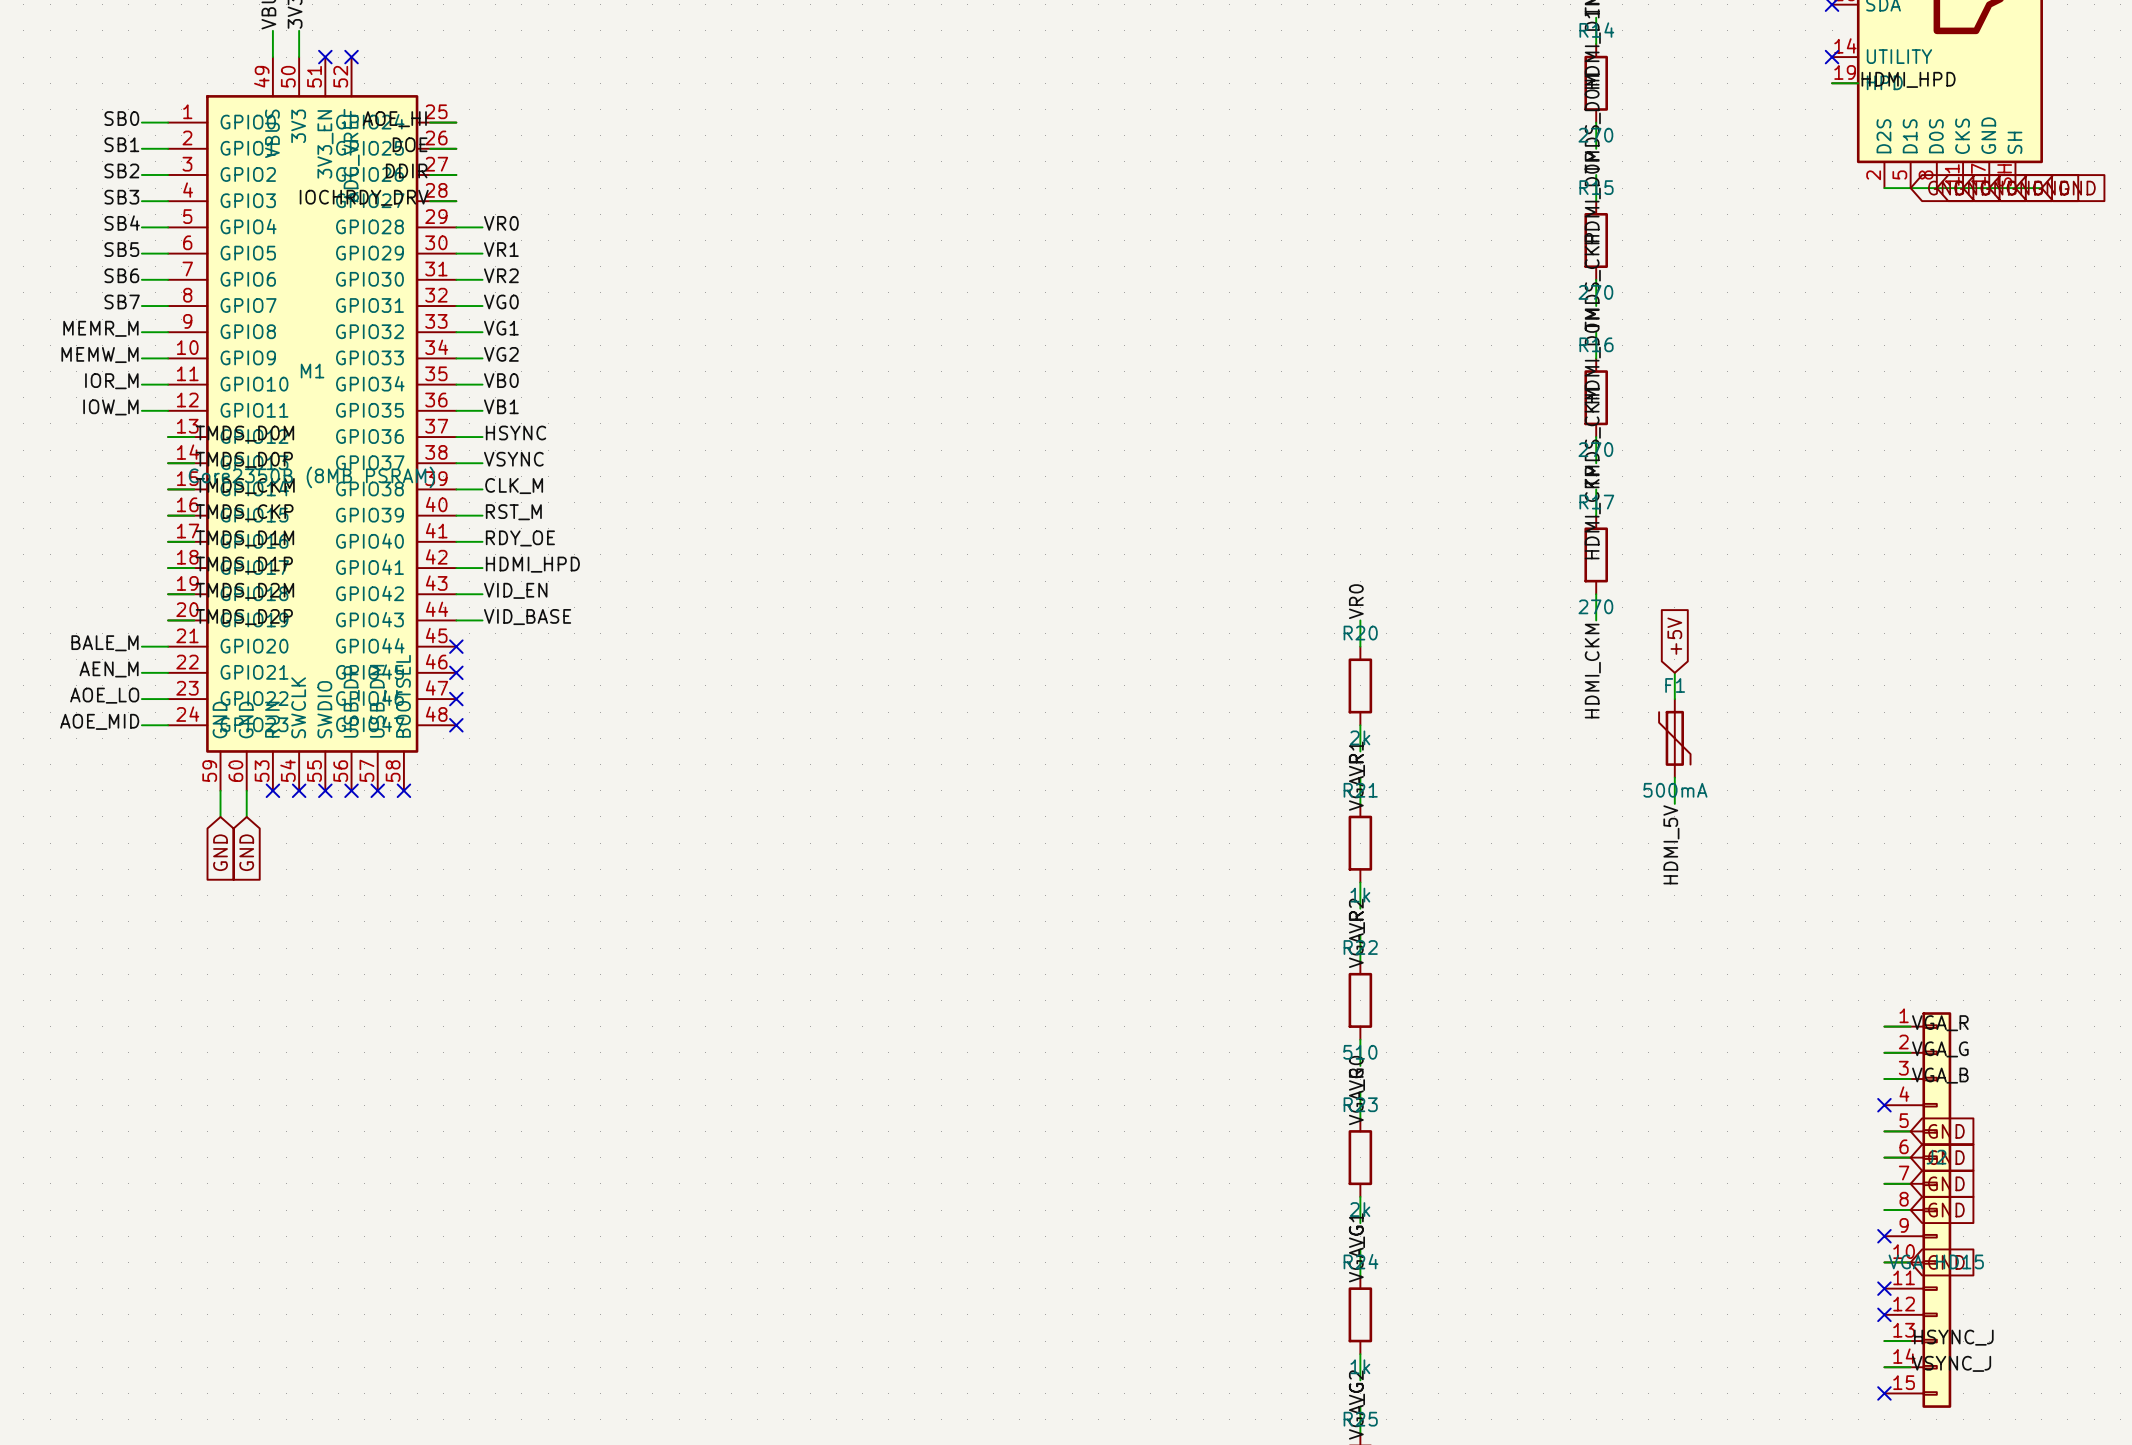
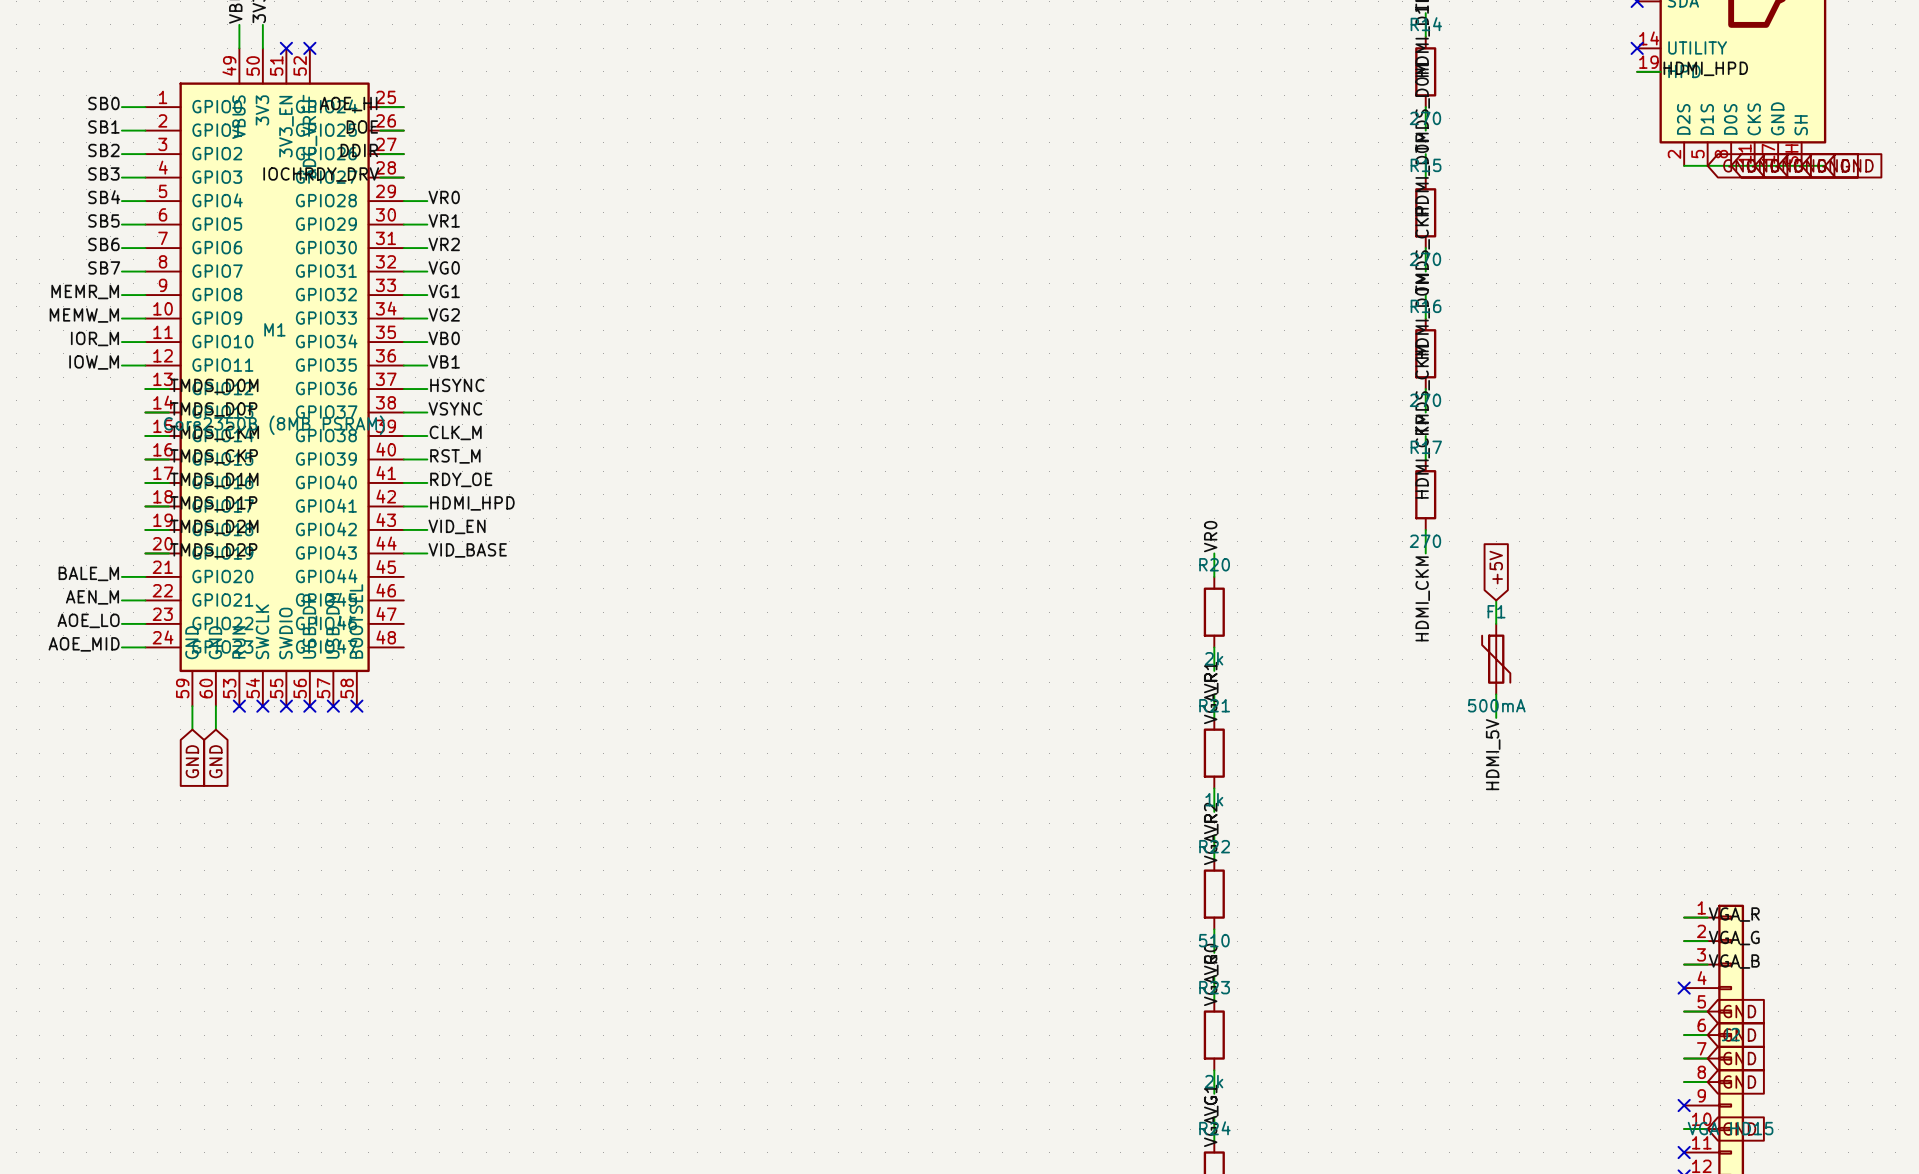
no-connect mark: (456, 646) -> none
no-connect mark: (456, 672) -> none
no-connect mark: (456, 699) -> none
no-connect mark: (456, 725) -> none

